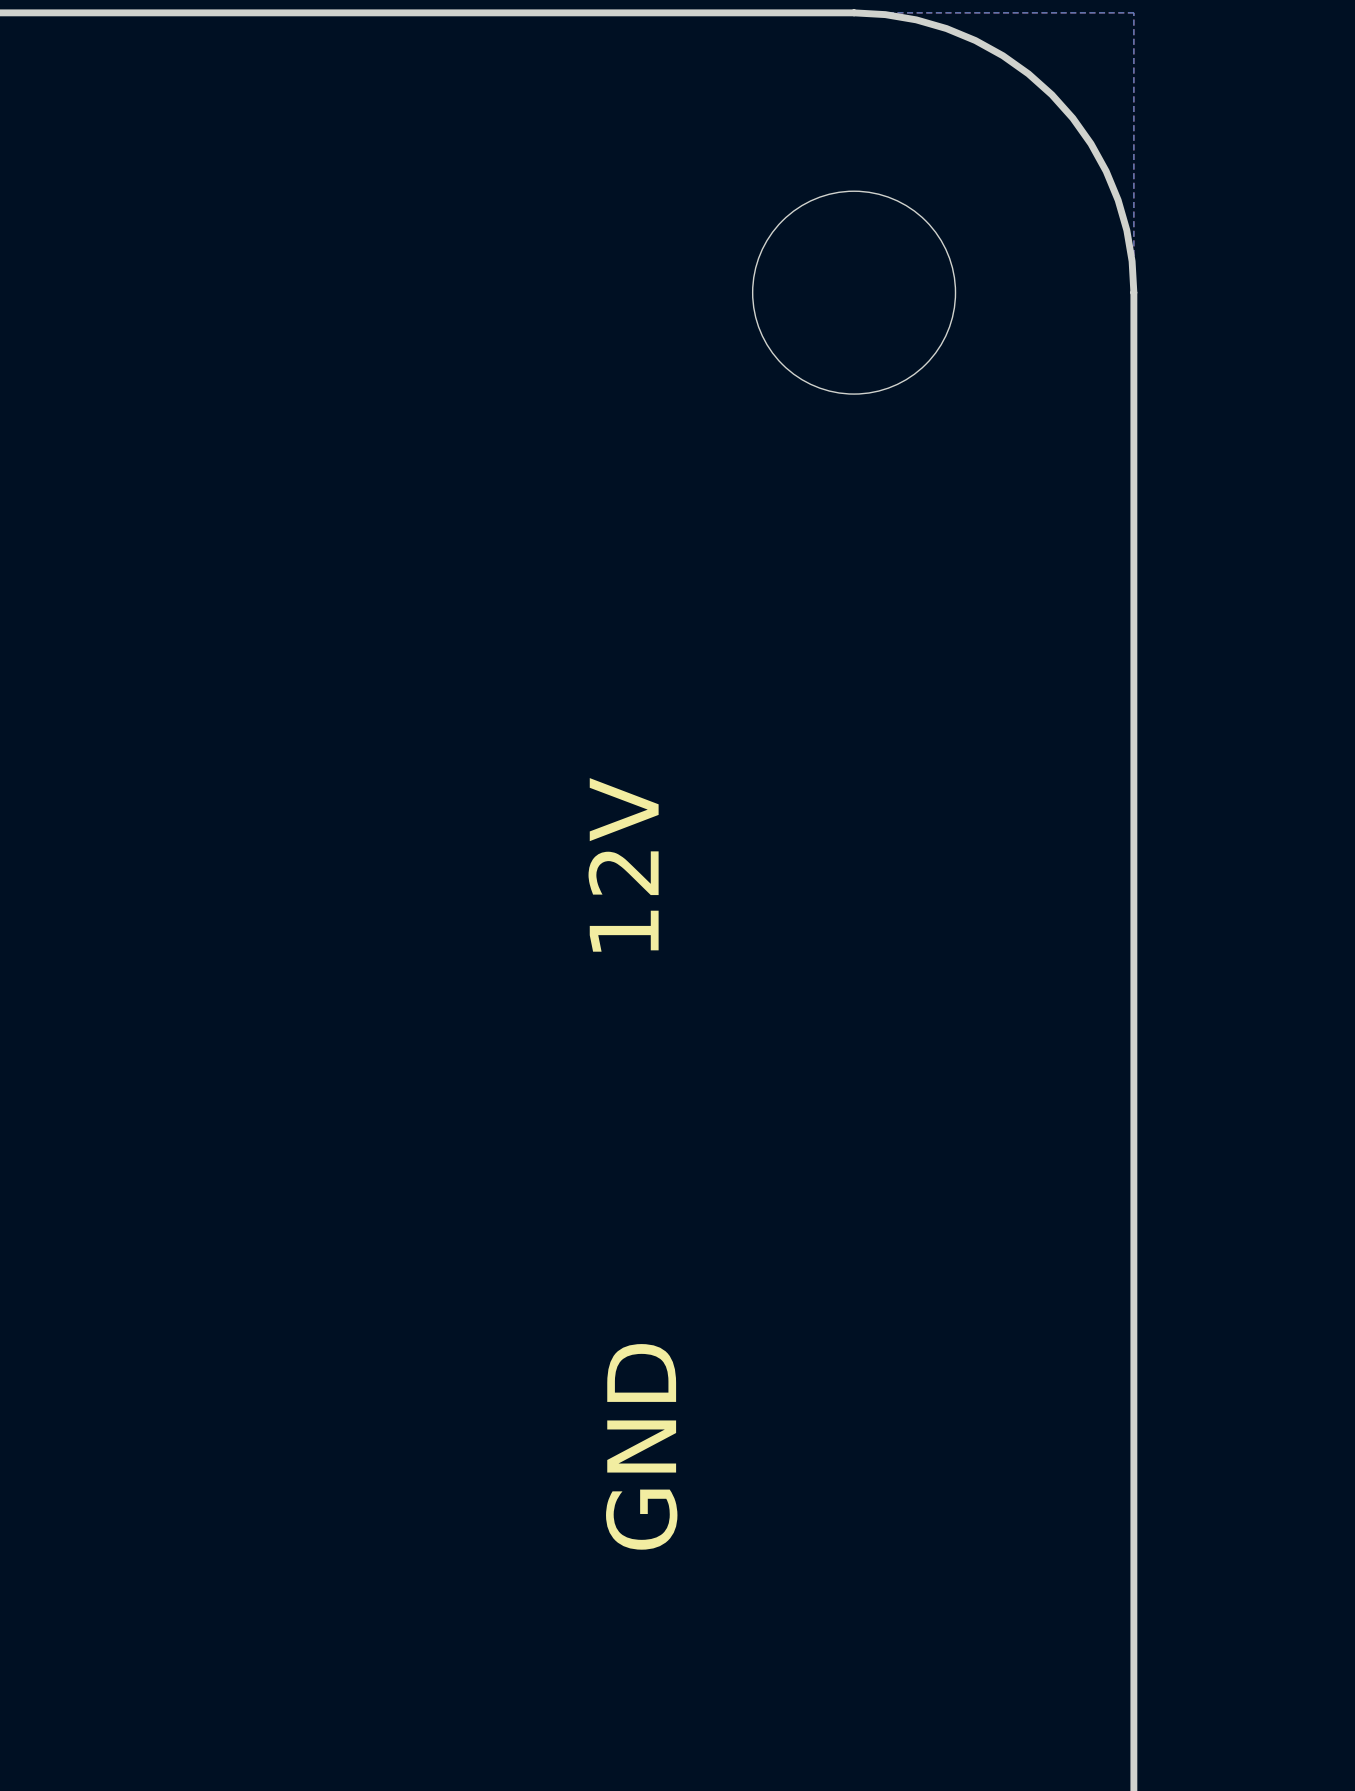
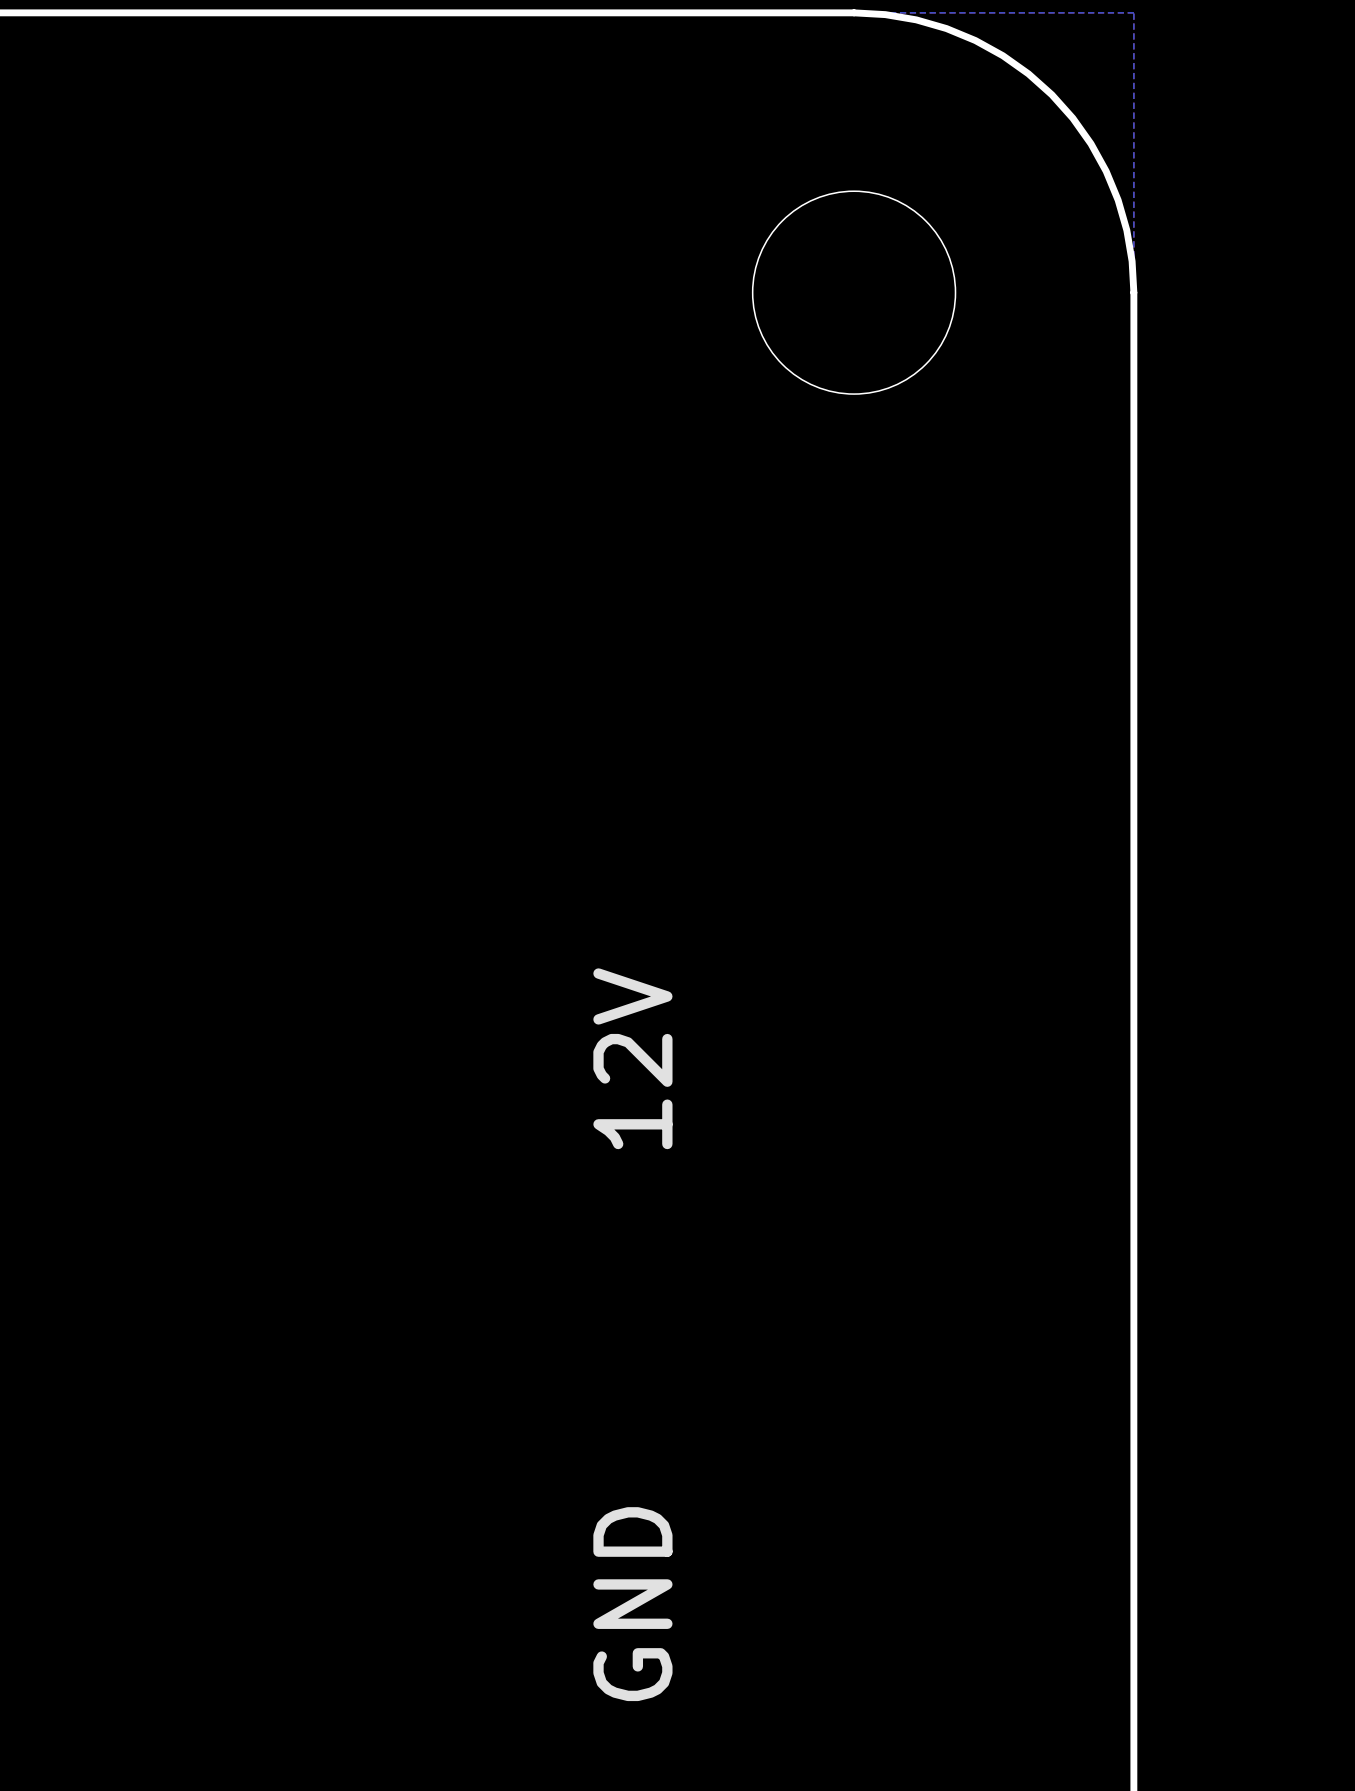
text position: 12V (623, 864) -> 12V (632, 1058)
text position: GND (641, 1446) -> GND (632, 1604)

